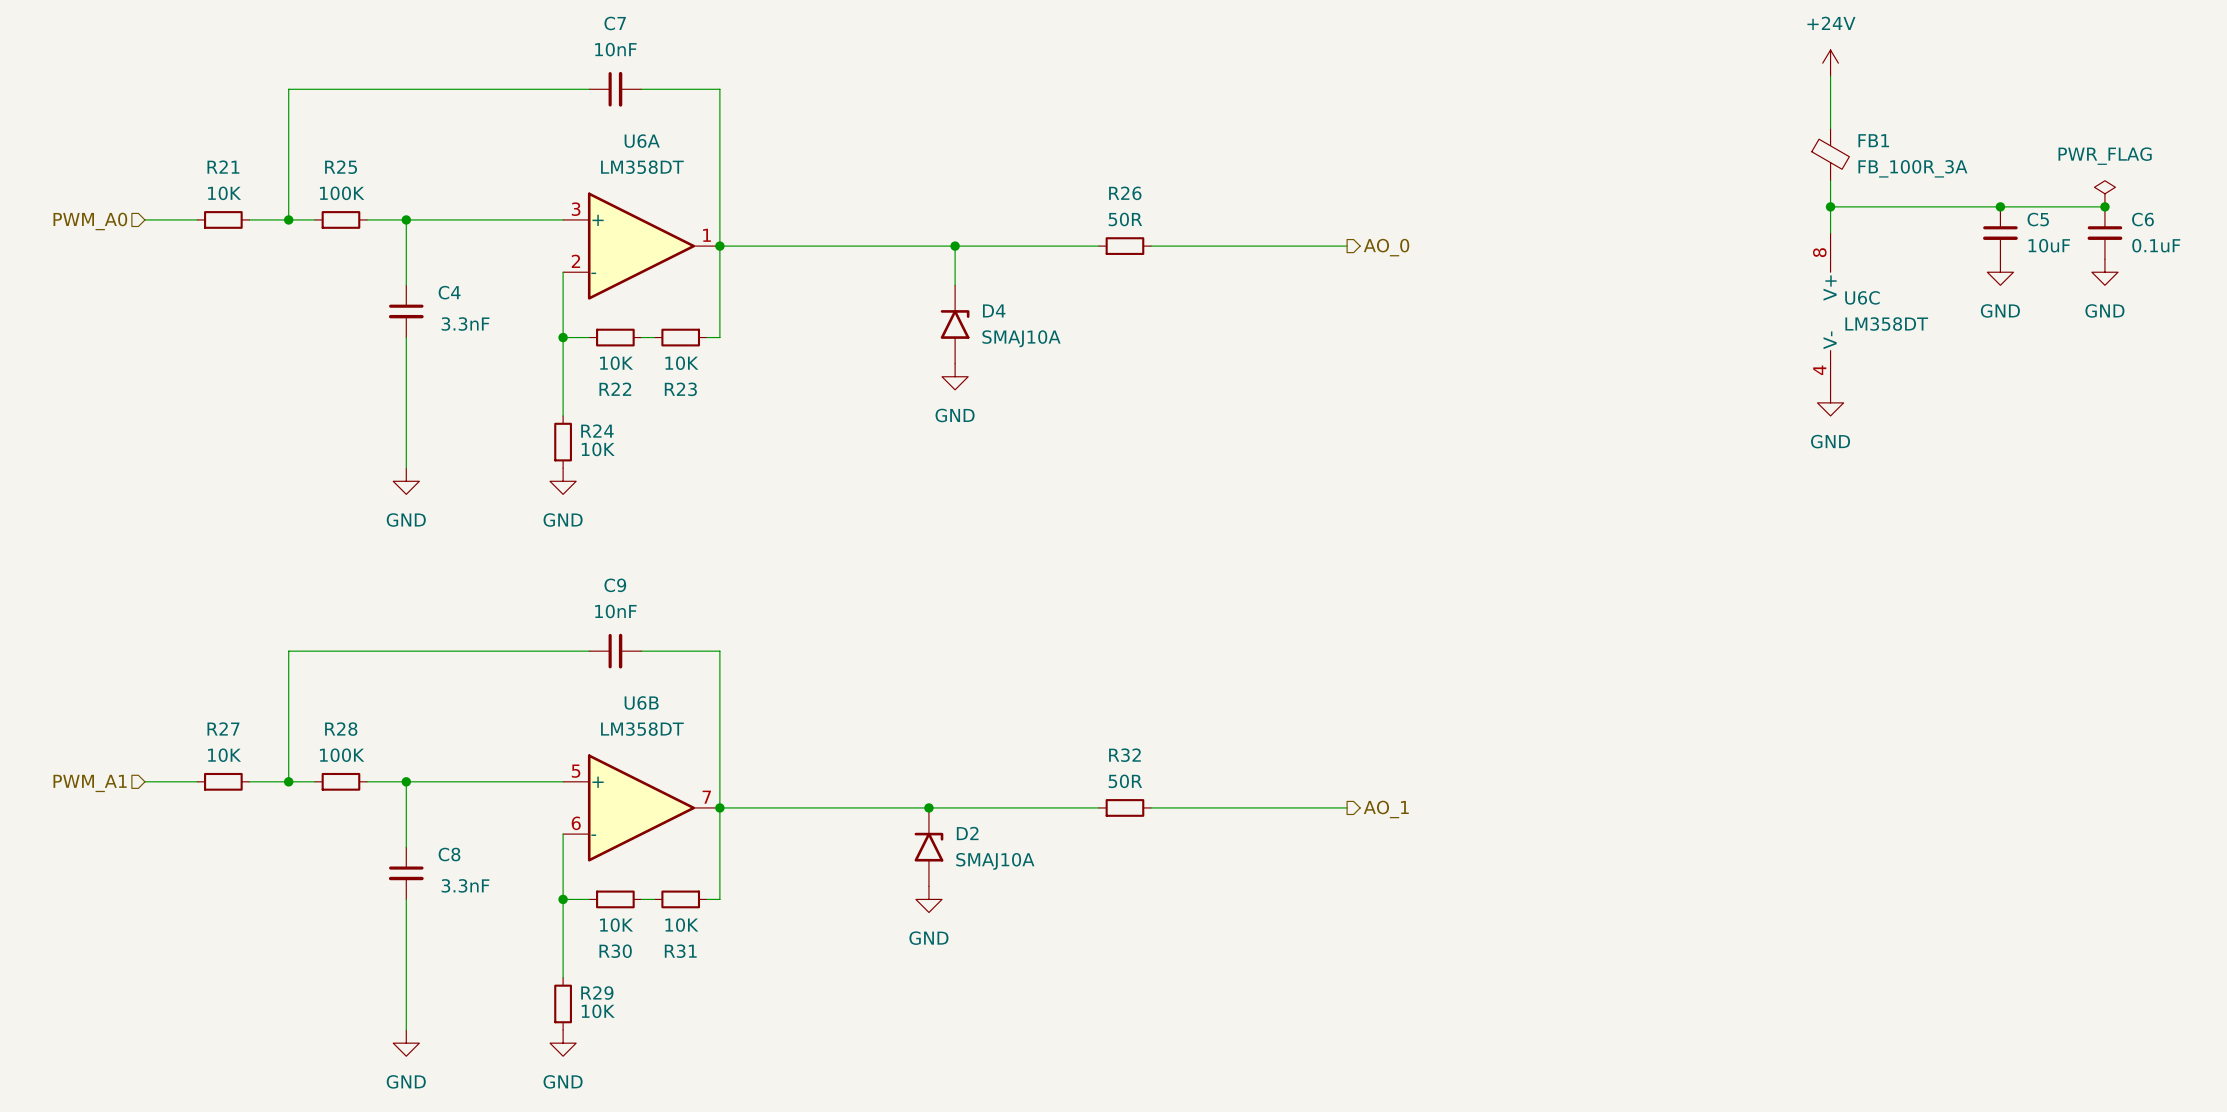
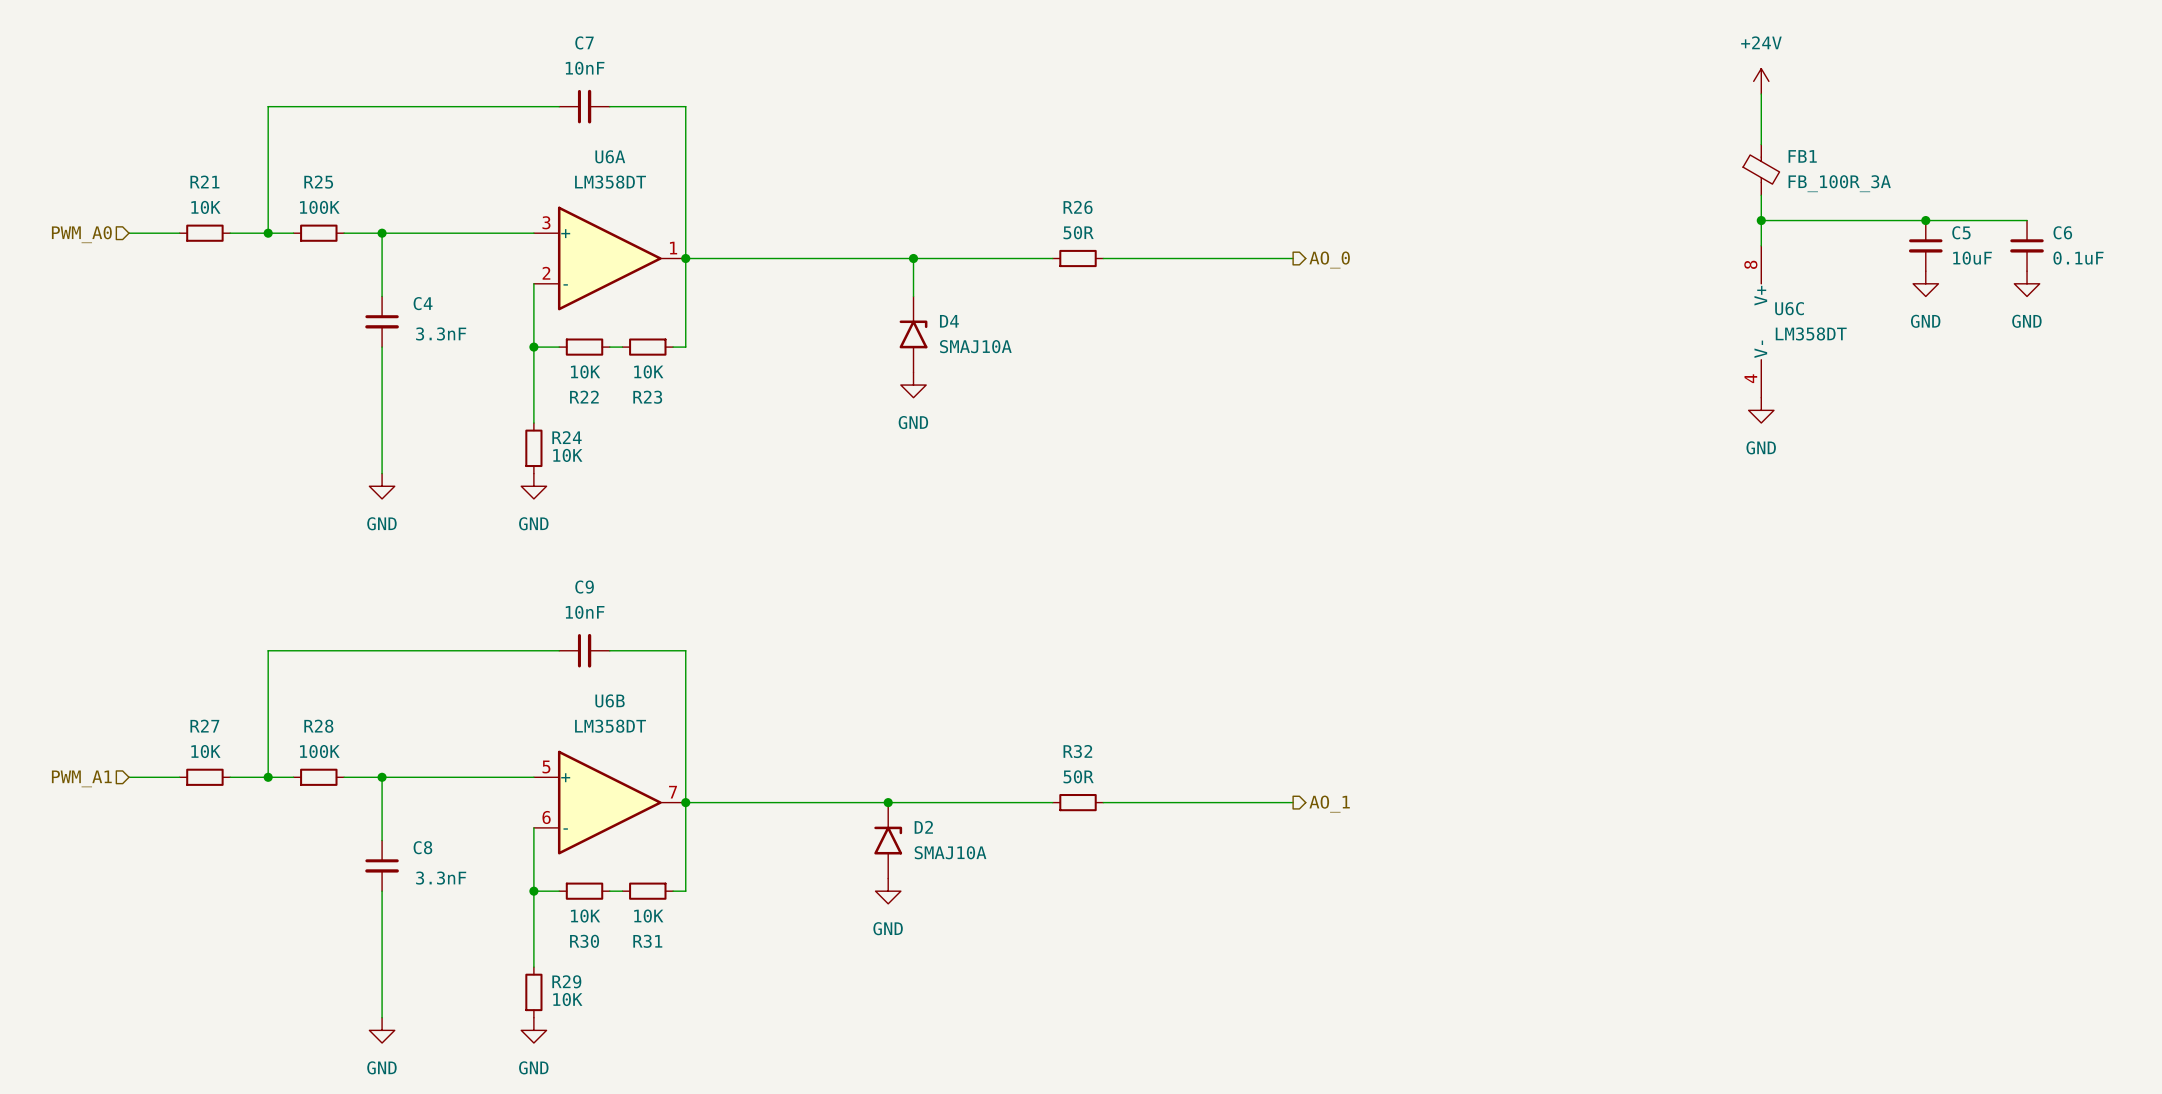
power symbol: PWR_FLAG (2104, 193) -> none
junction: (2104, 206) -> none

